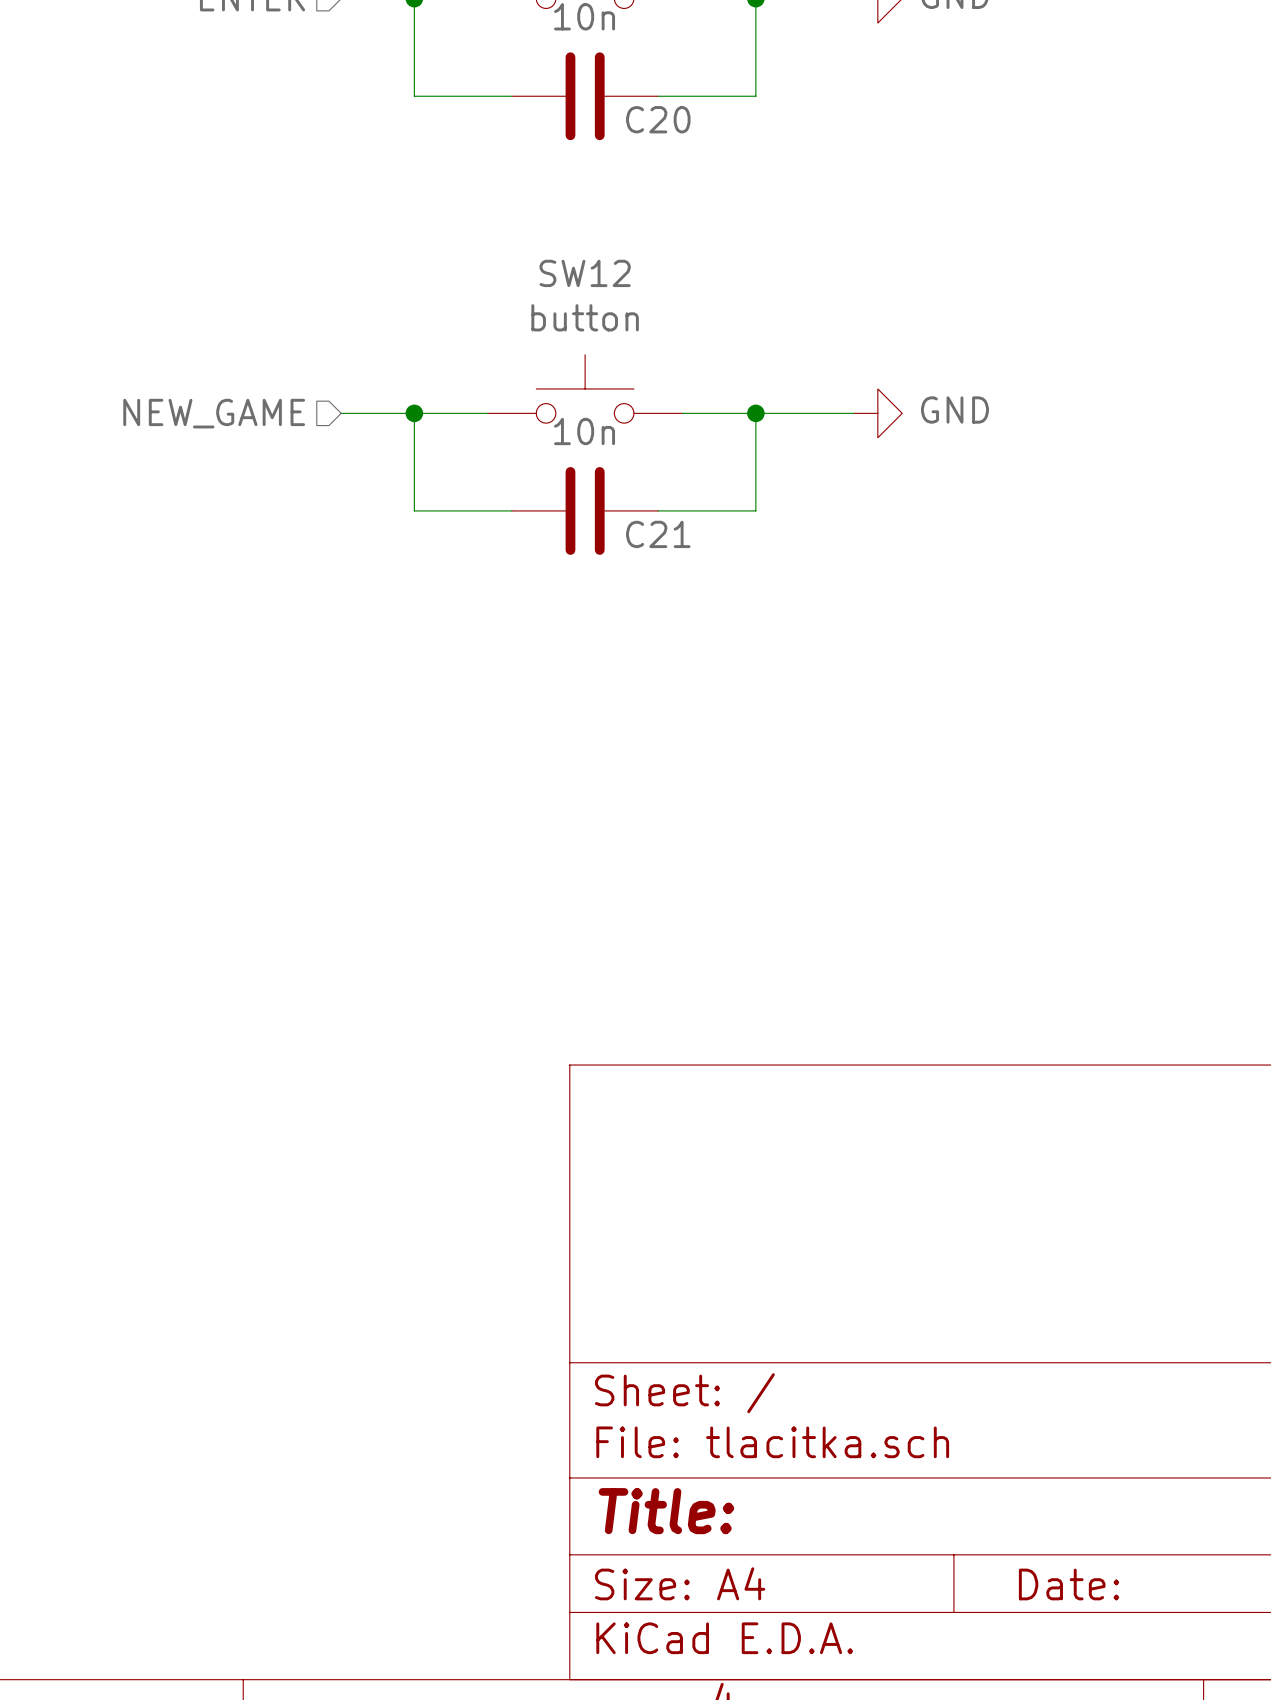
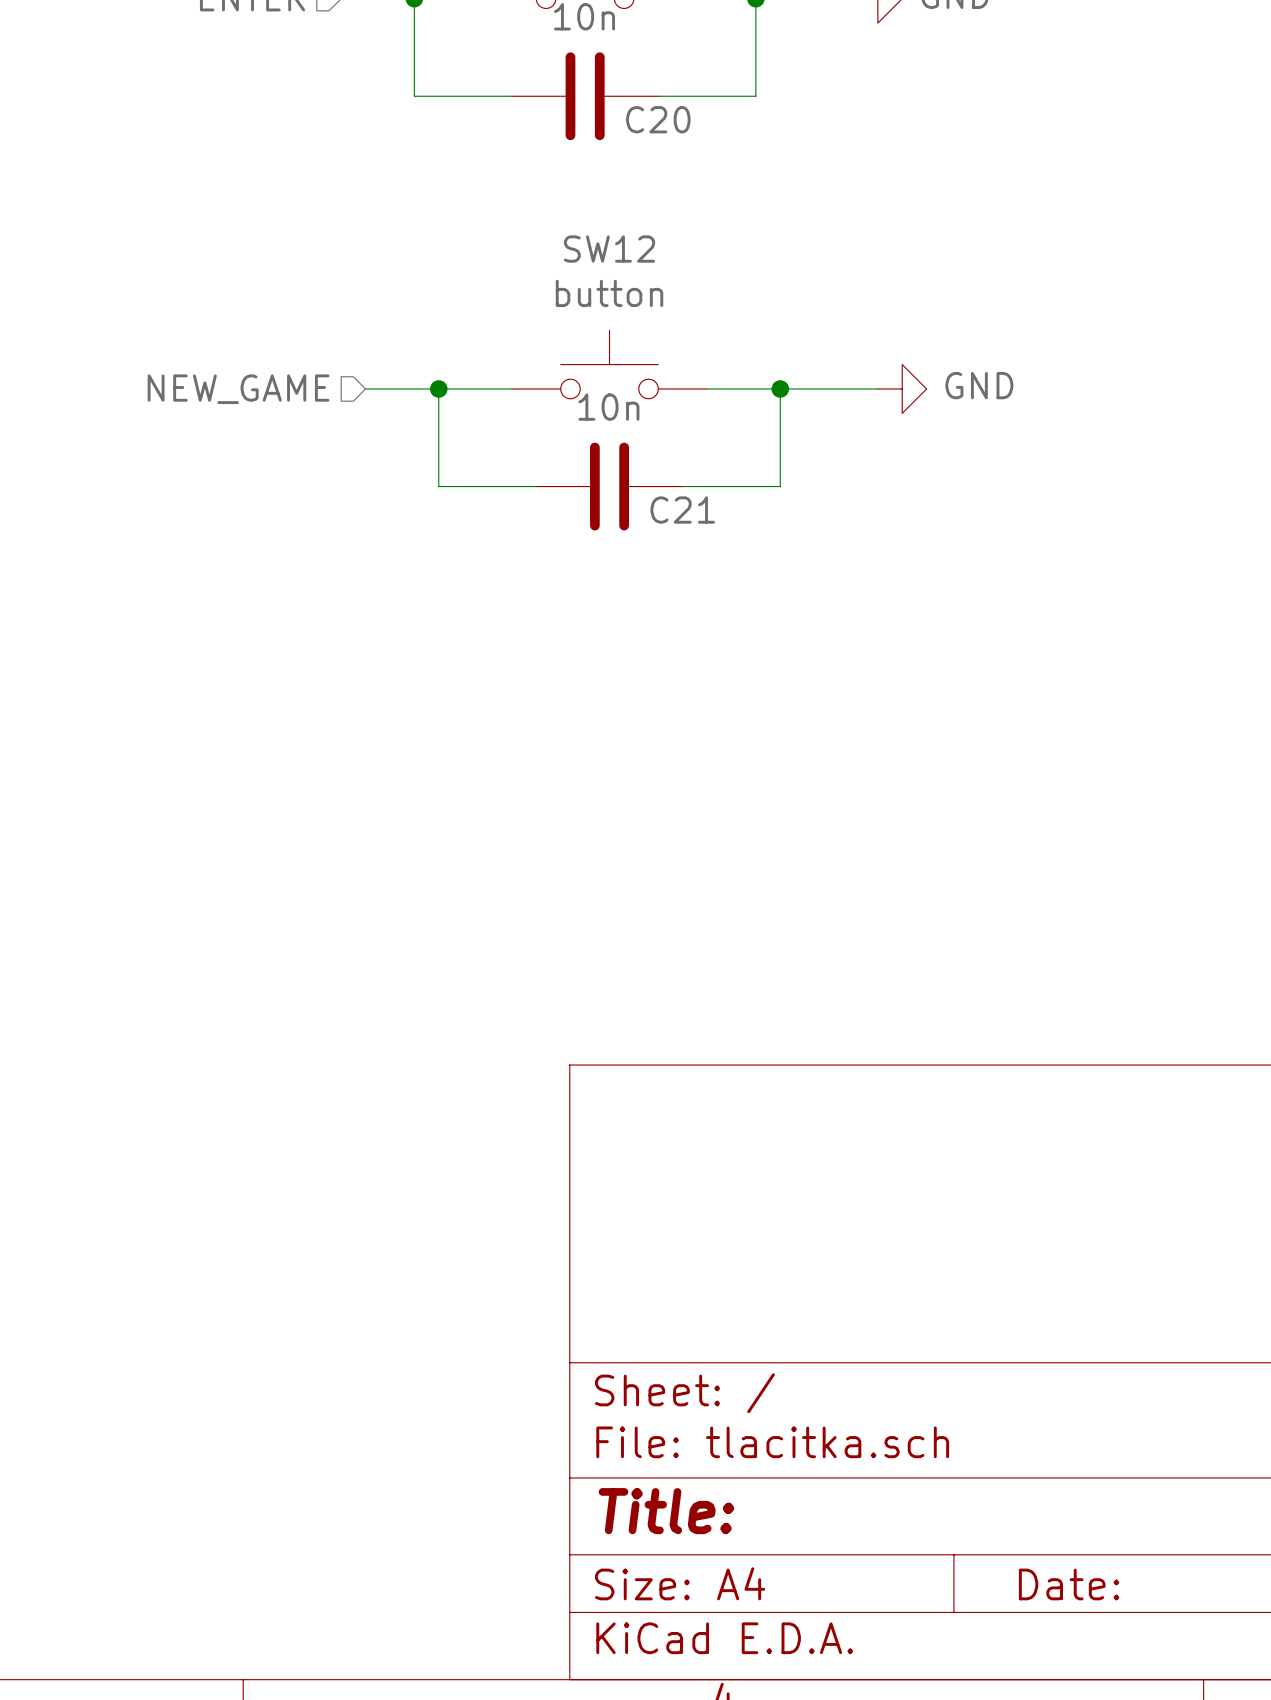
SW12 position: (585, 388) -> (609, 364)
hierarchical label position: NEW_GAME (214, 413) -> NEW_GAME (238, 389)
wire: (341, 413) (487, 413) -> (365, 388) (511, 388)
wire: (414, 413) (414, 510) (511, 510) -> (438, 388) (438, 486) (536, 486)
junction position: (414, 413) -> (438, 388)
wire: (682, 413) (853, 413) -> (707, 388) (877, 388)
wire: (755, 413) (755, 510) (658, 510) -> (780, 388) (780, 486) (682, 486)
junction position: (755, 413) -> (780, 388)
power symbol position: GND (877, 413) -> GND (902, 388)
C21 position: (585, 510) -> (609, 486)

